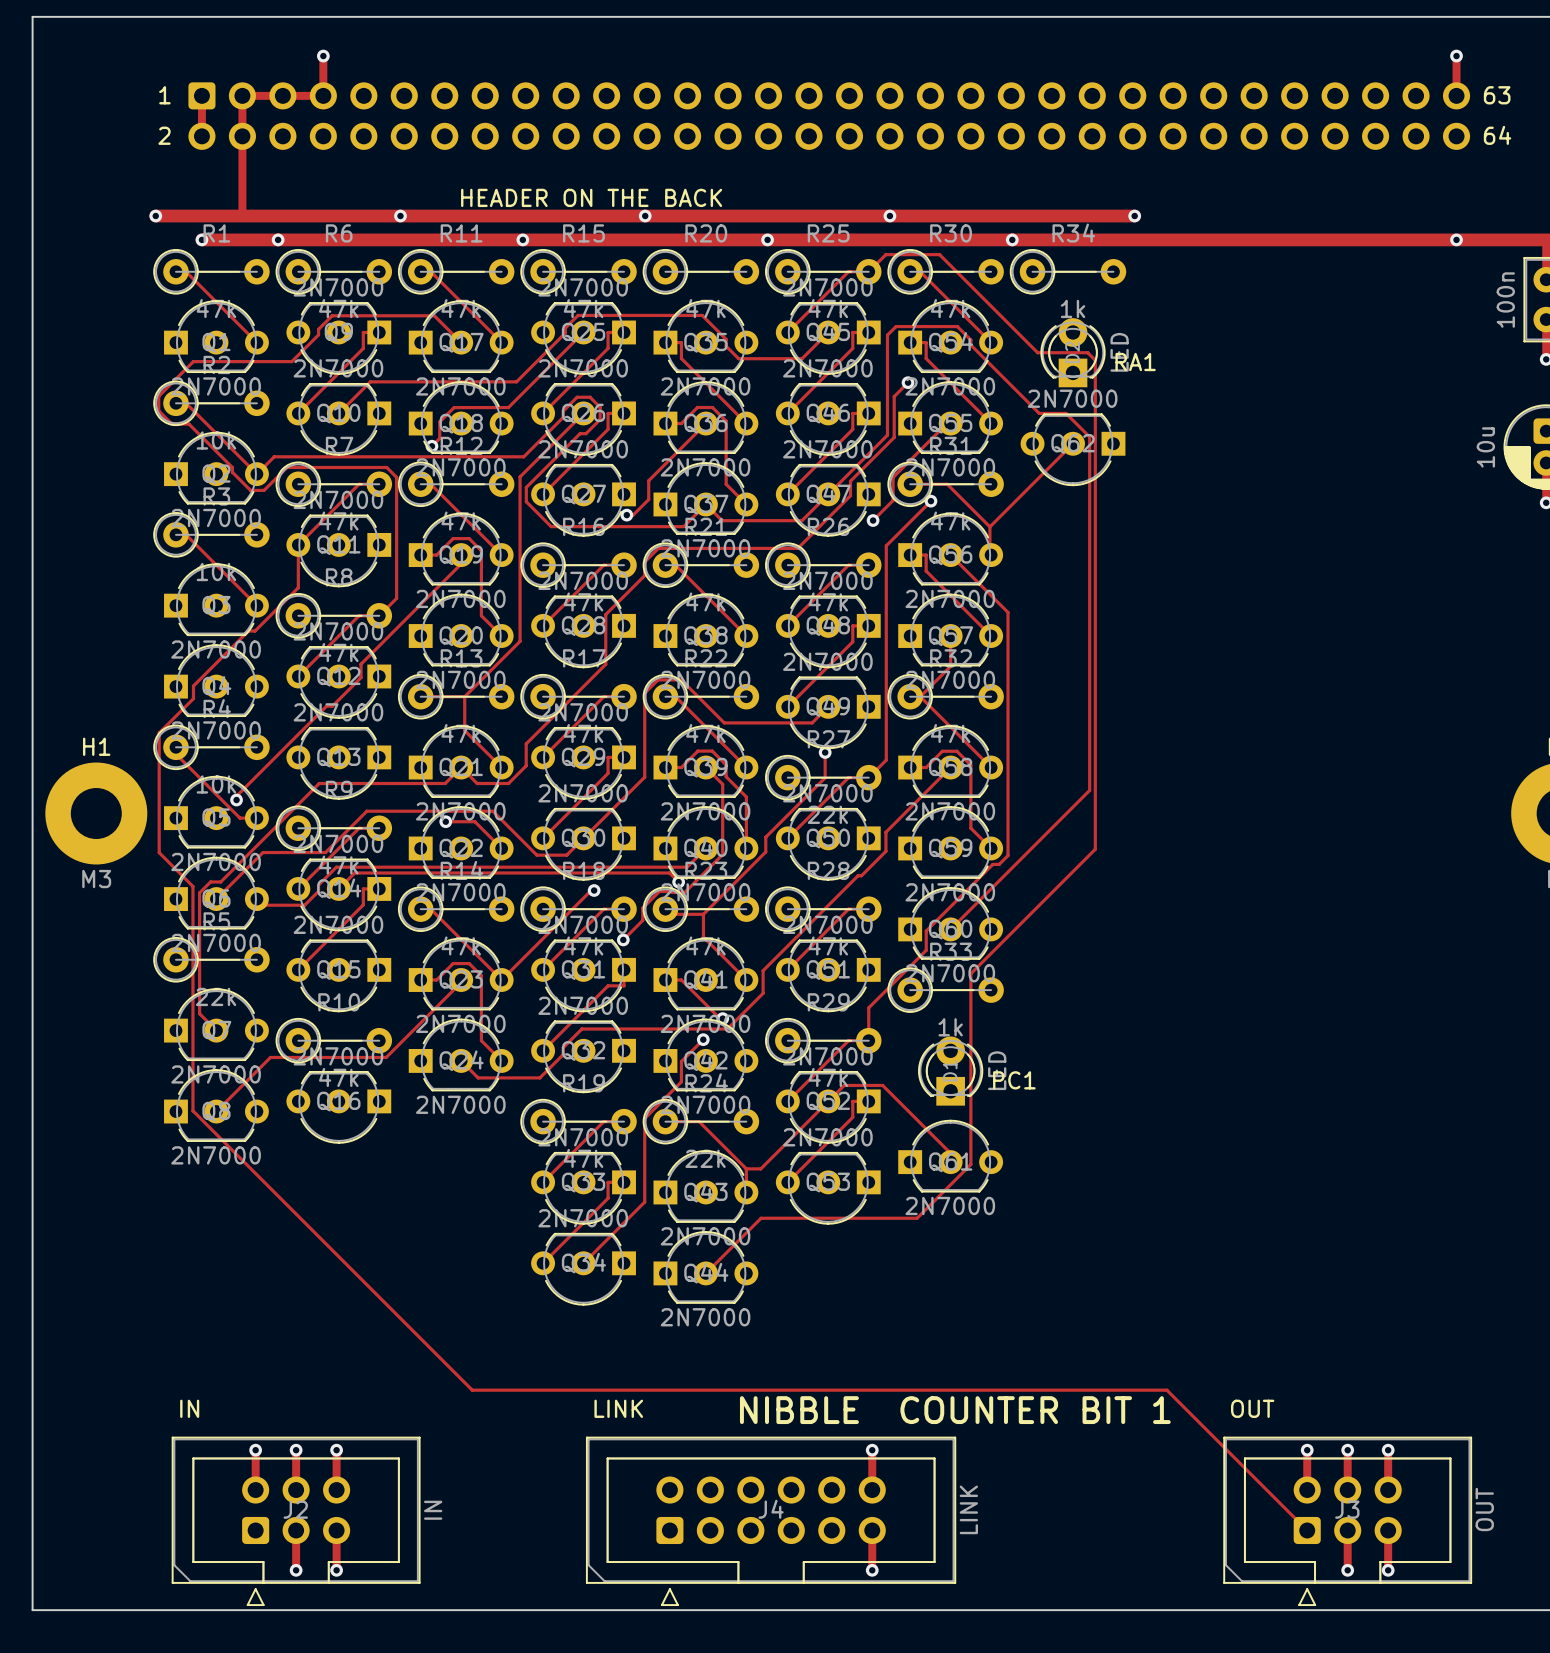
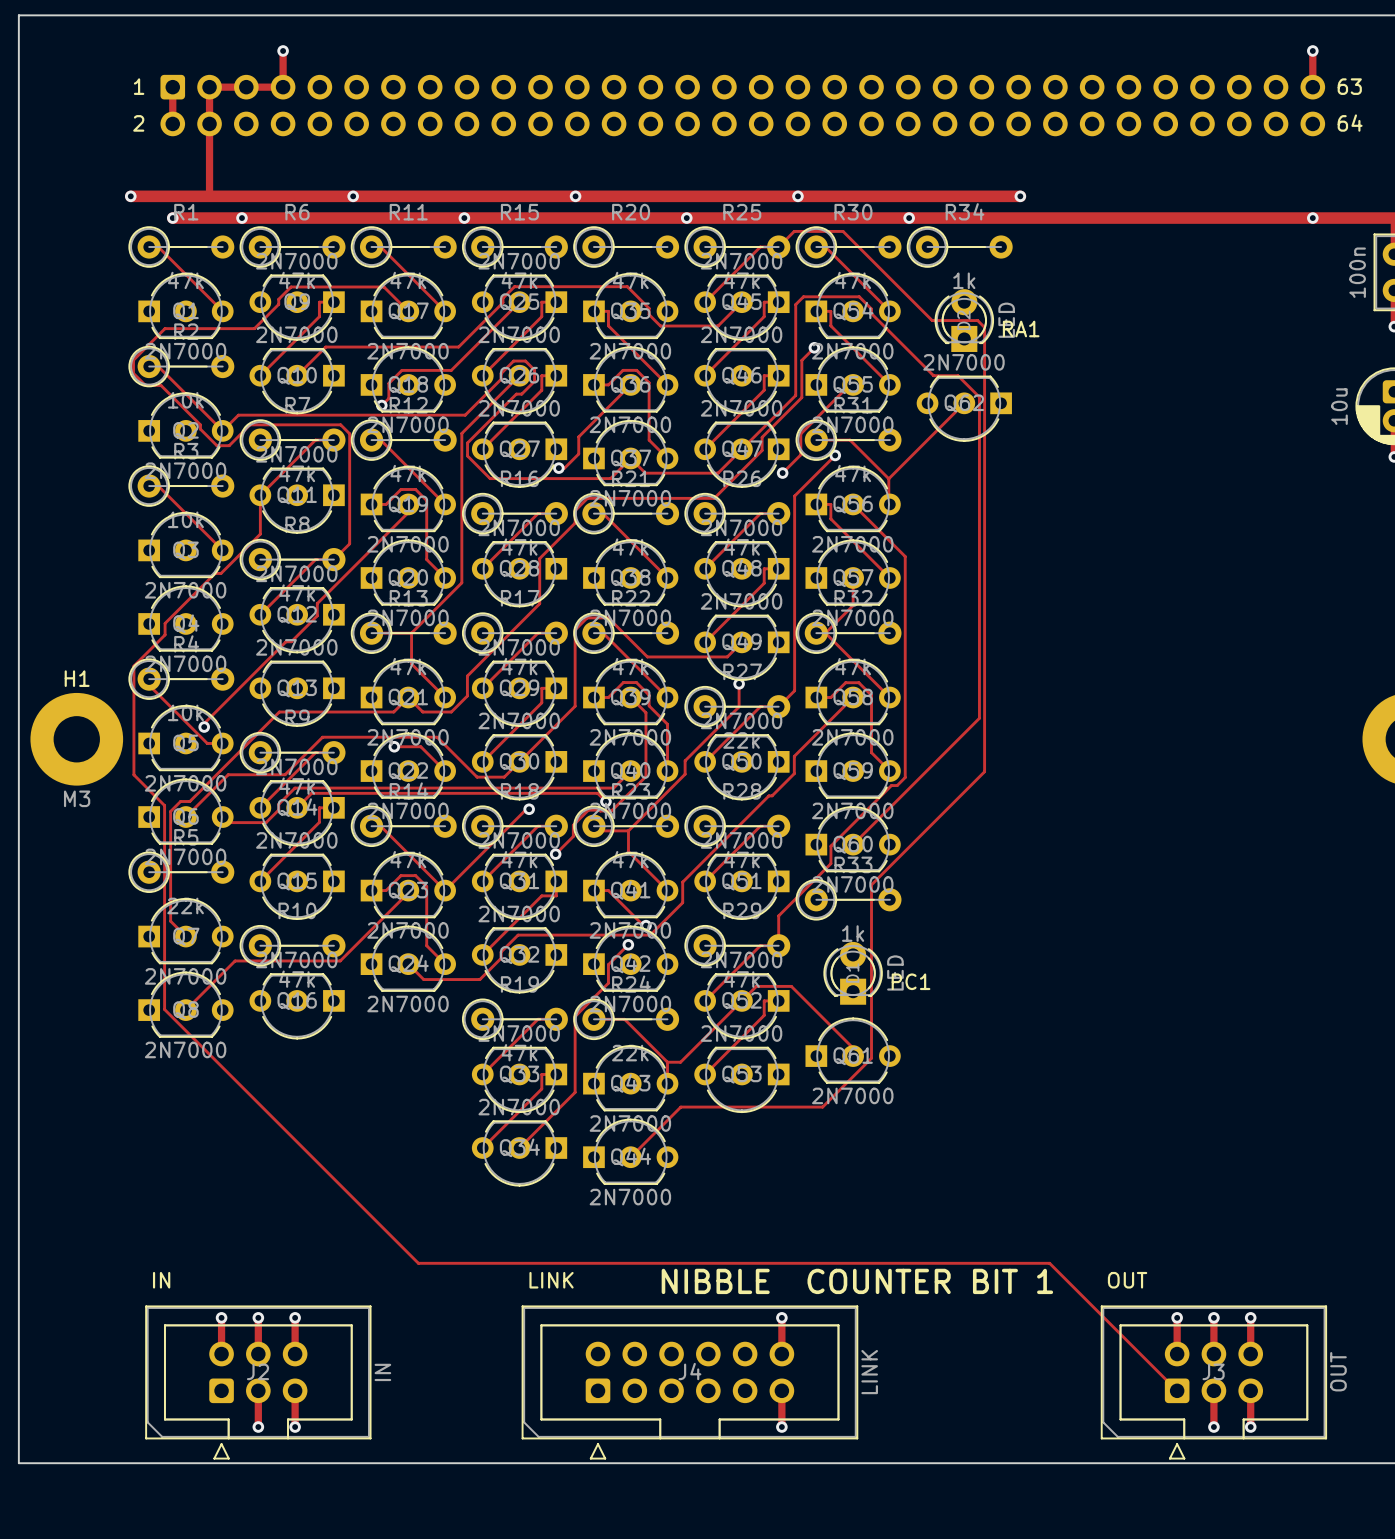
text: HEADER ON THE BACK (591, 197) -> none

